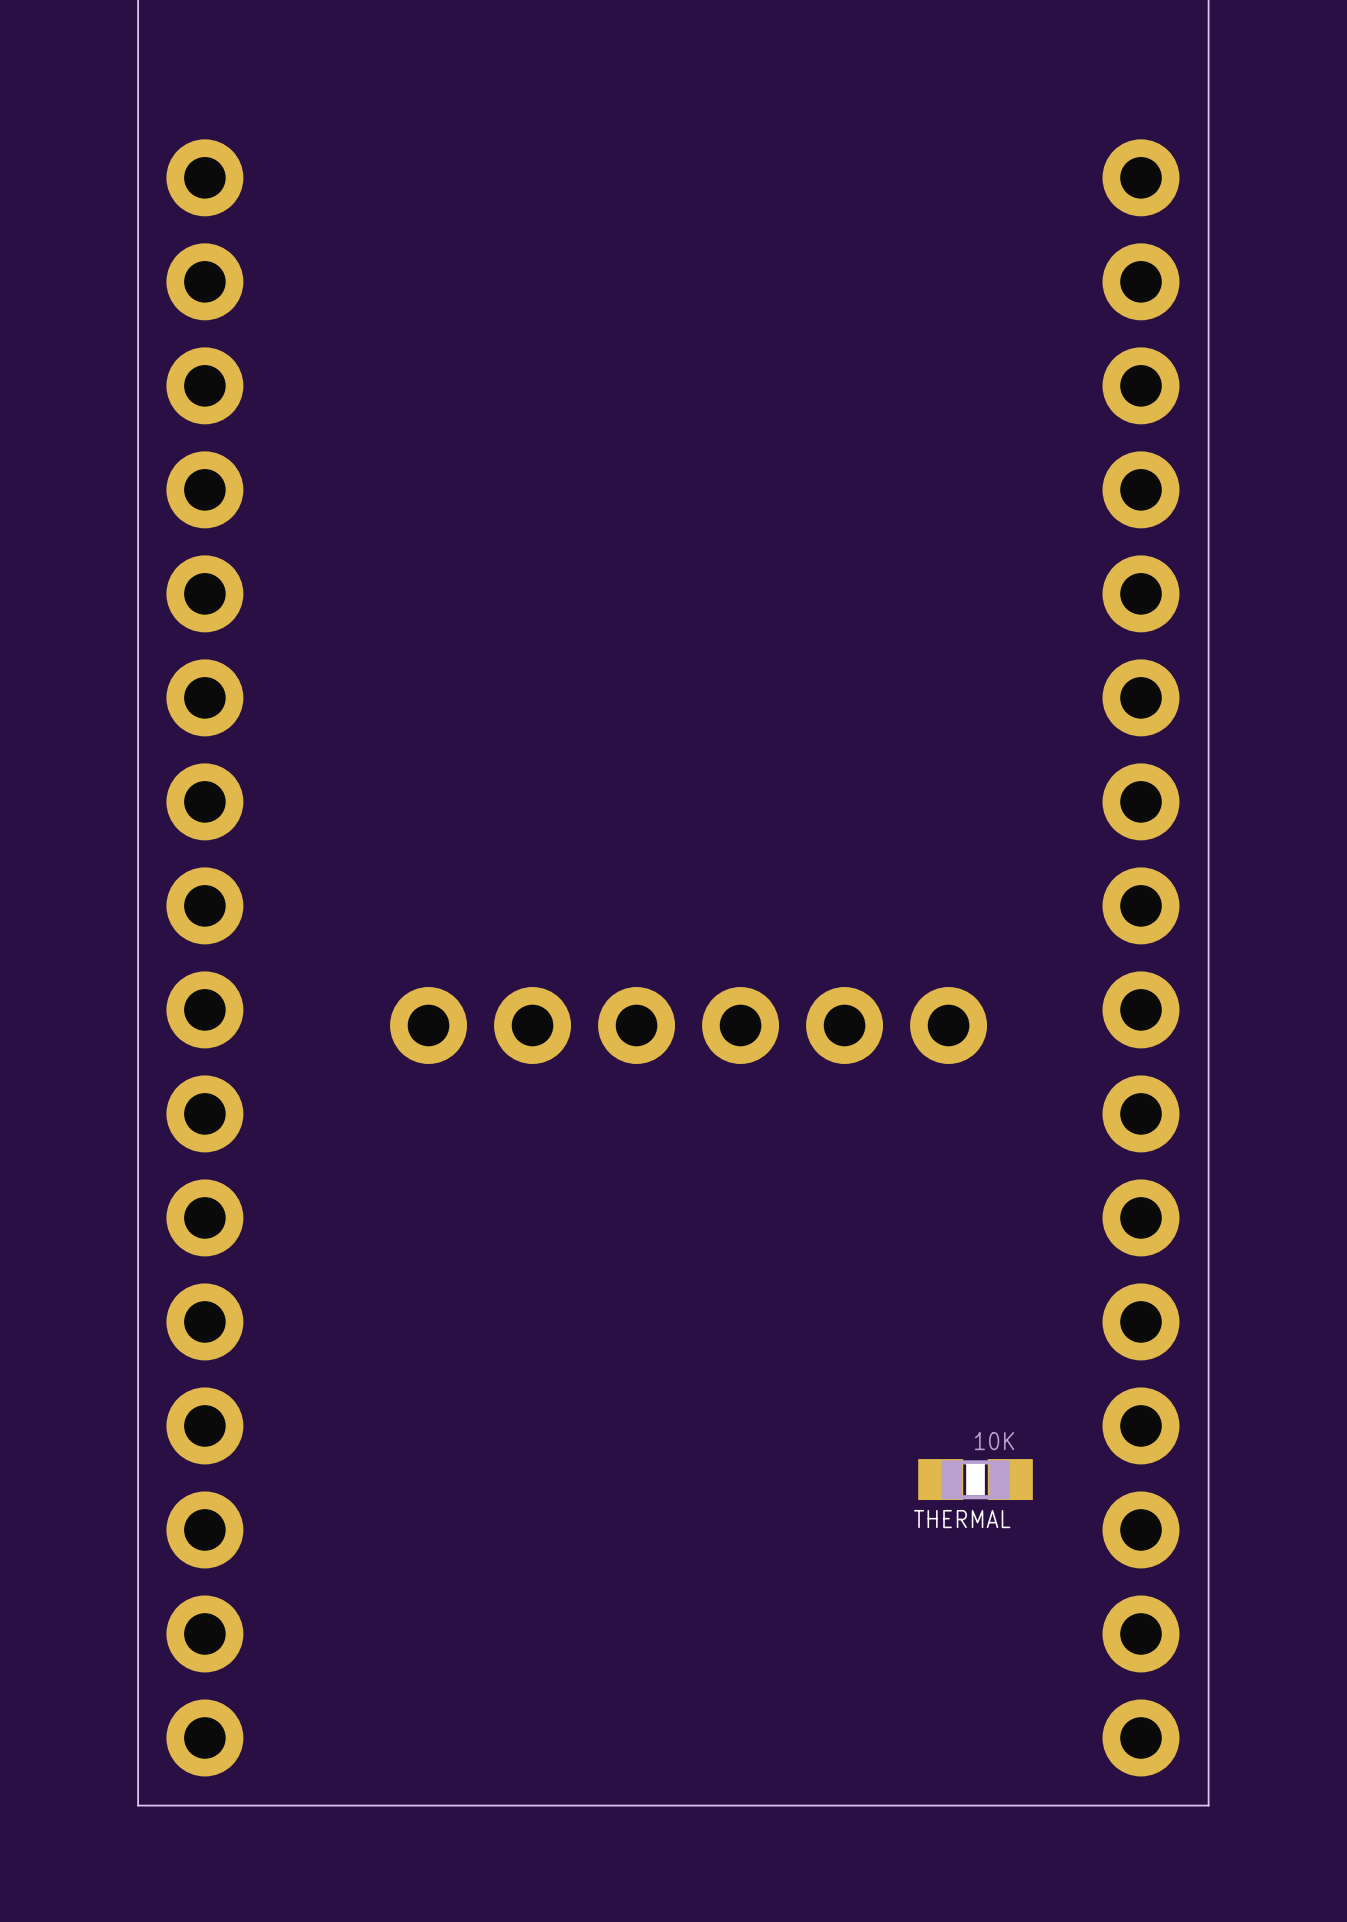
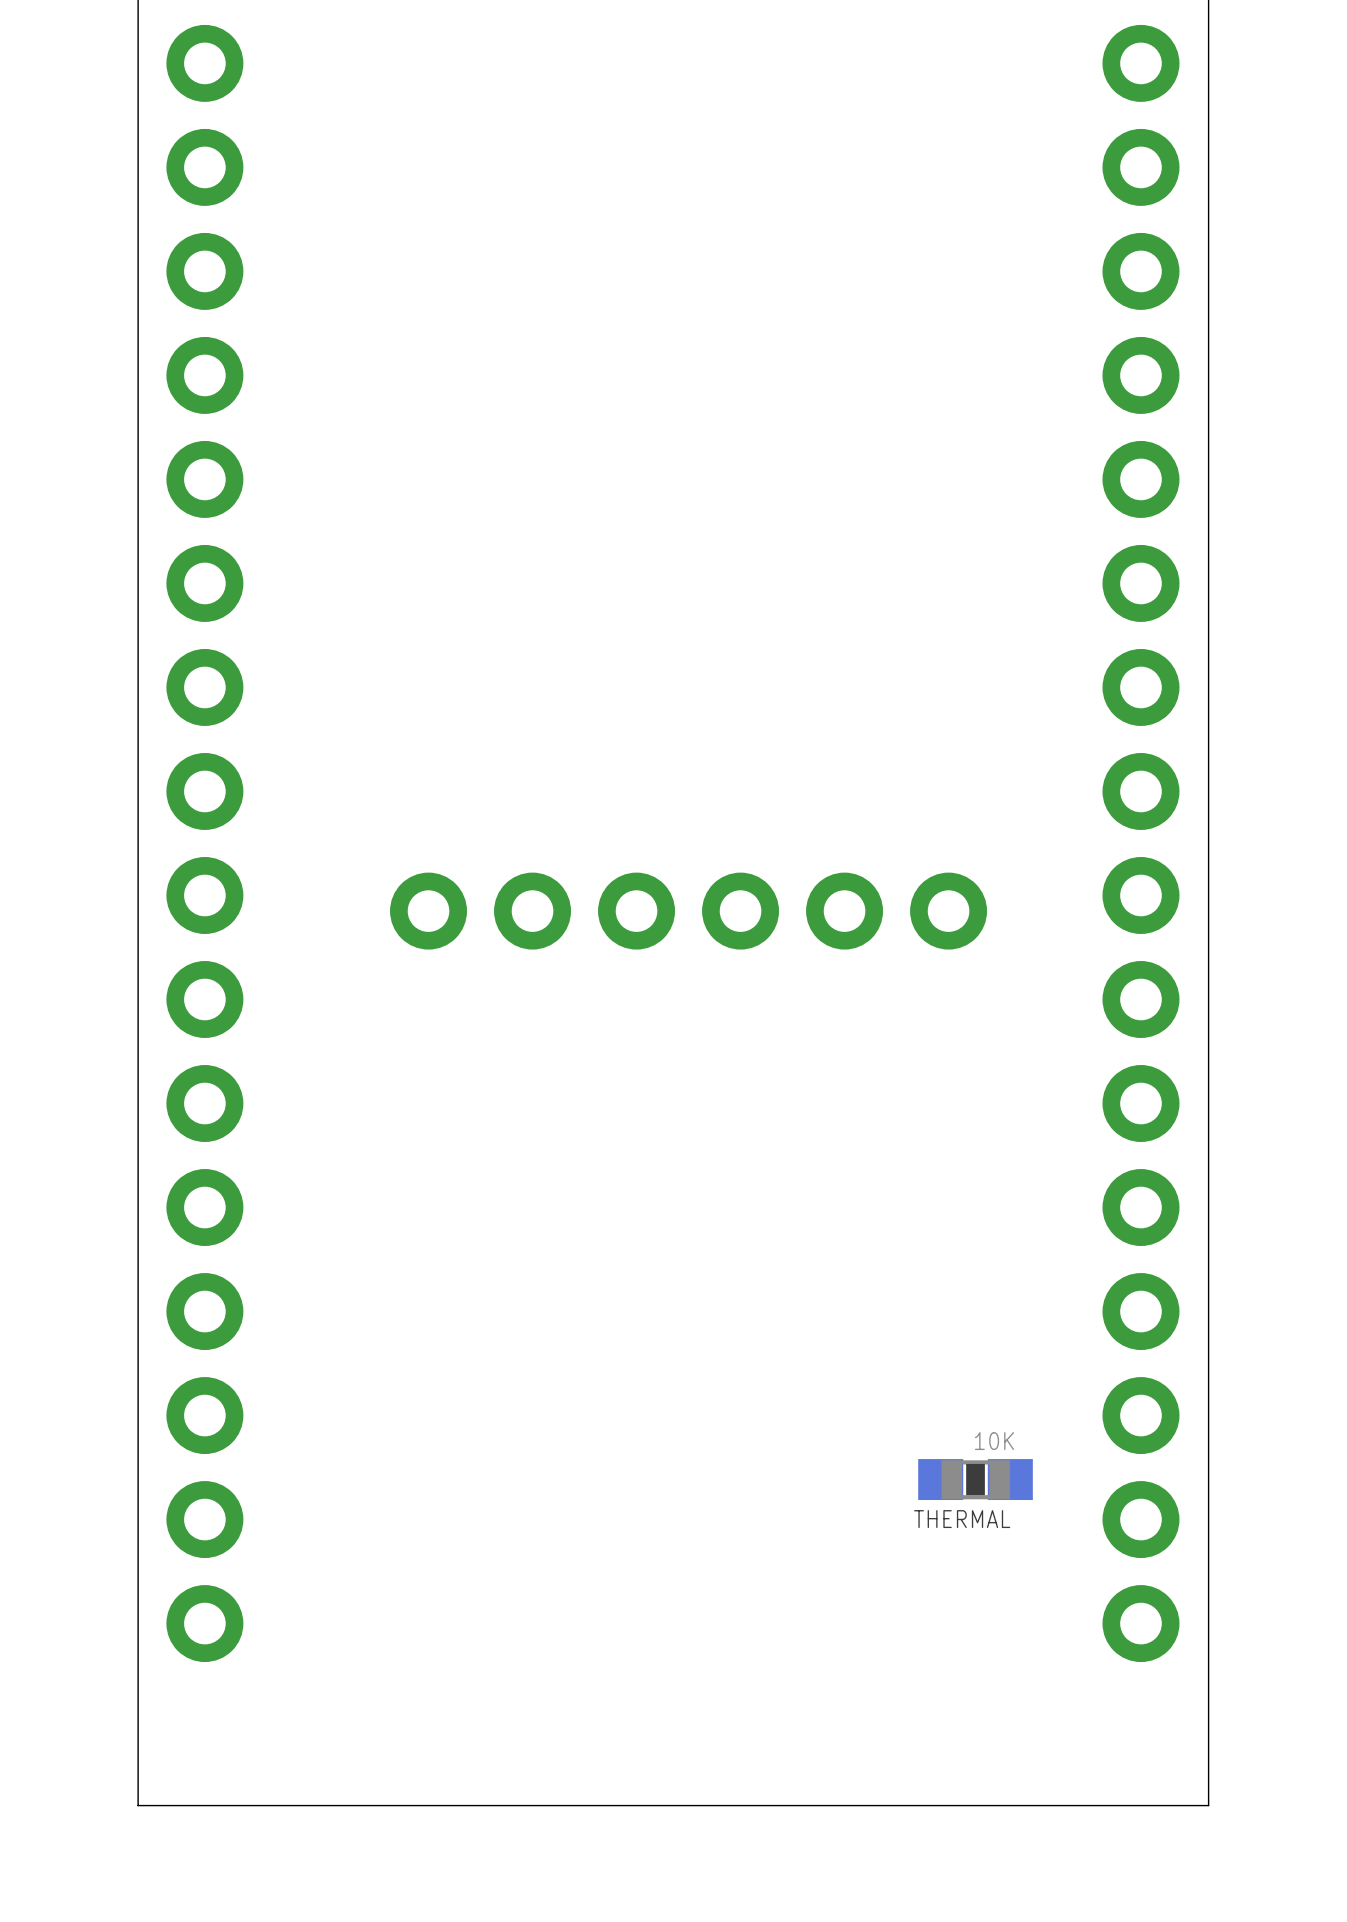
part position: (204, 957) -> (204, 843)
part position: (1140, 957) -> (1140, 843)
part position: (688, 1025) -> (688, 911)

